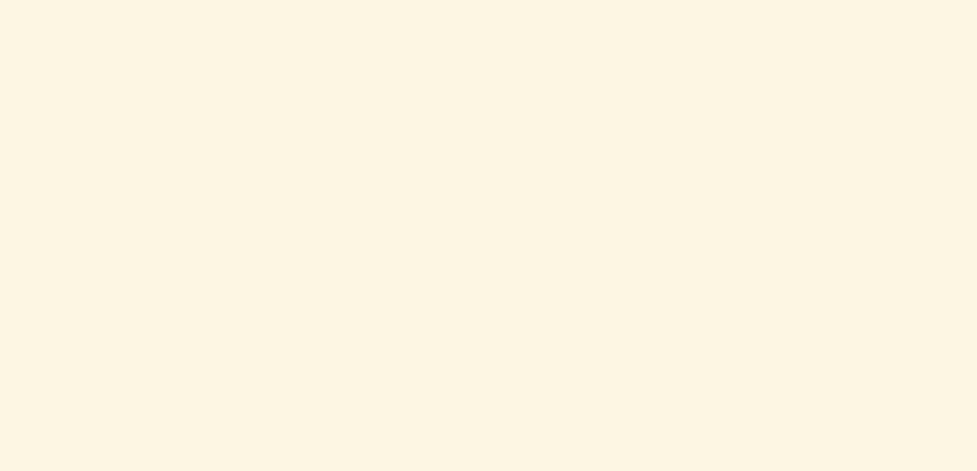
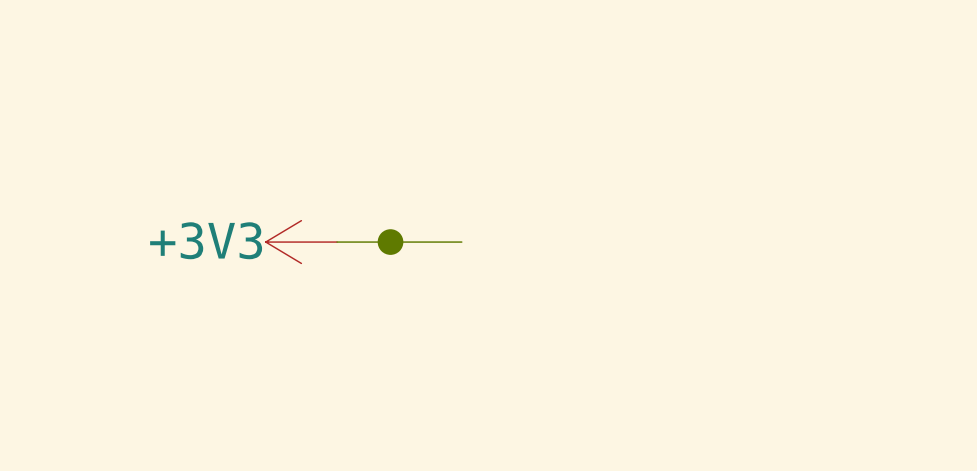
power symbol: none -> +3V3 (301, 242)
wire: none -> (337, 242) (461, 242)
junction: none -> (390, 242)

